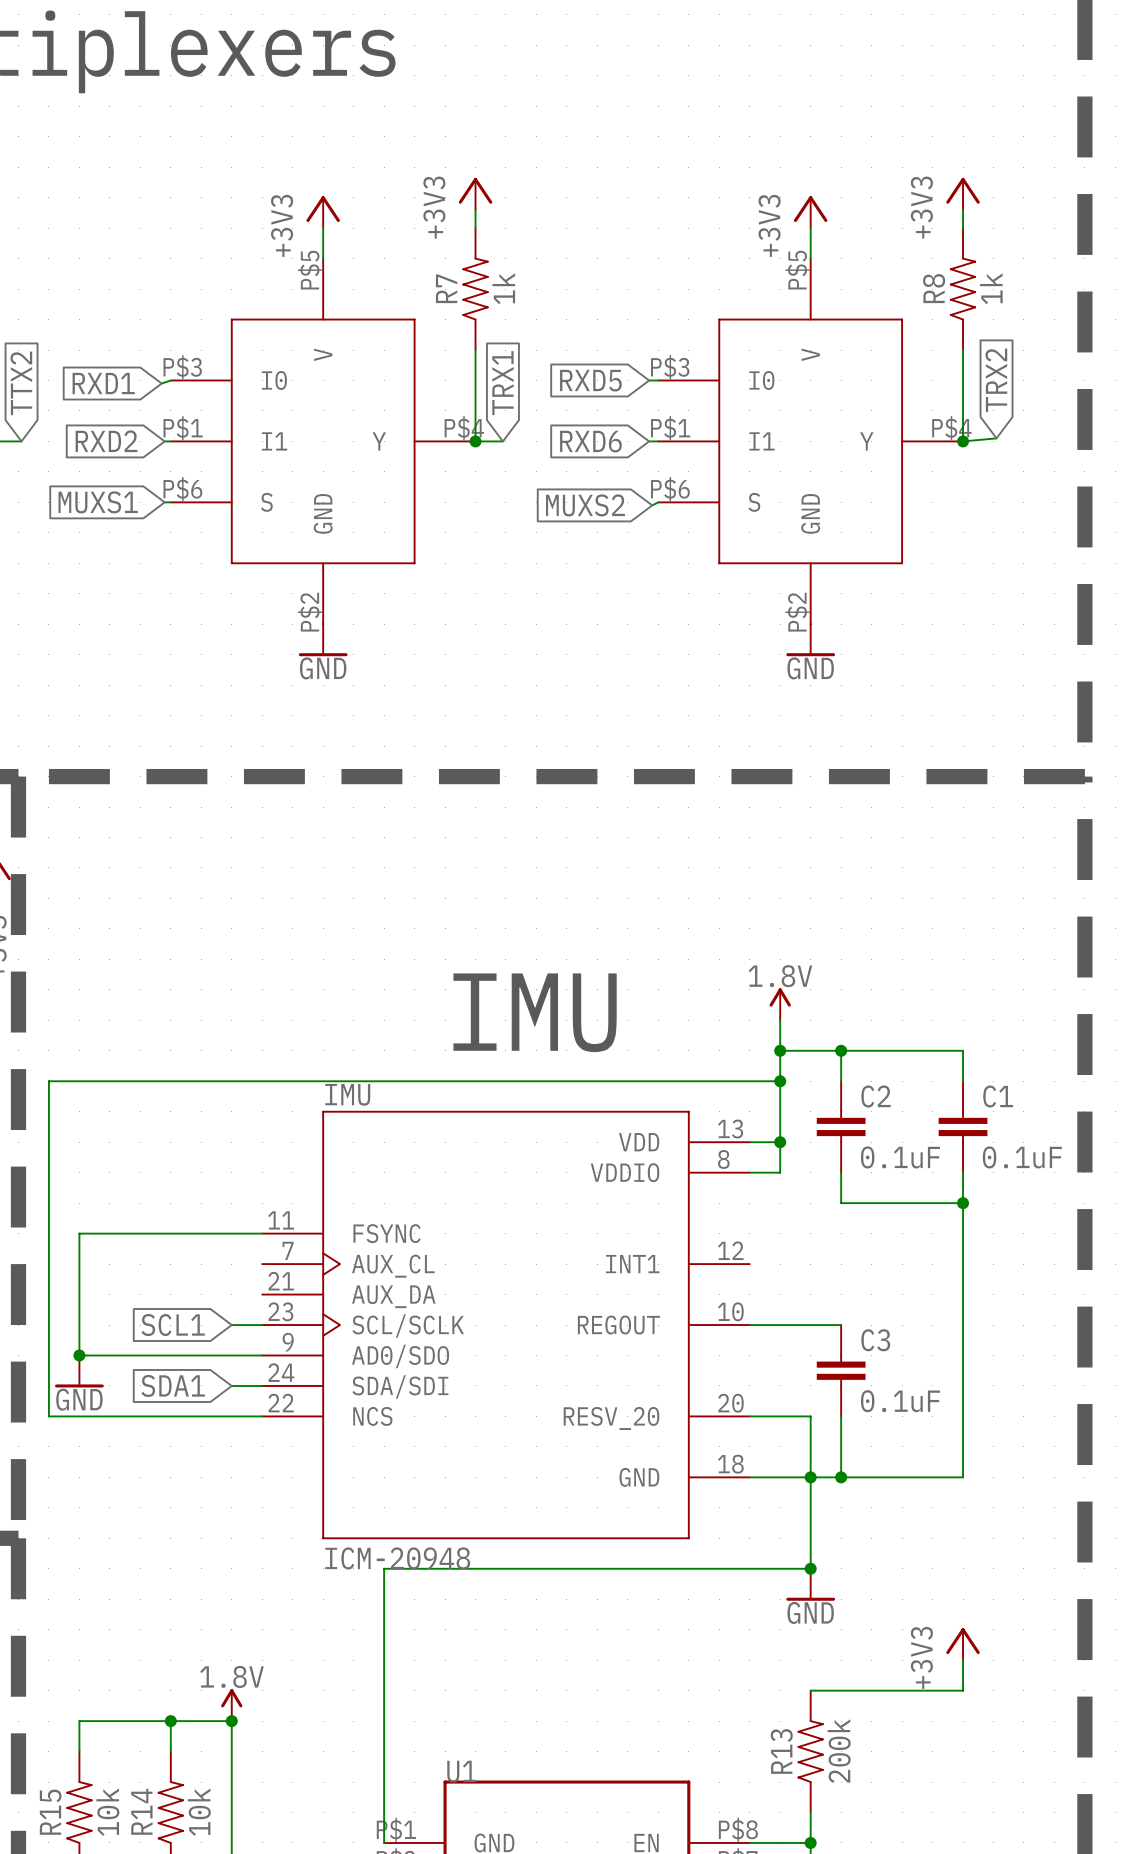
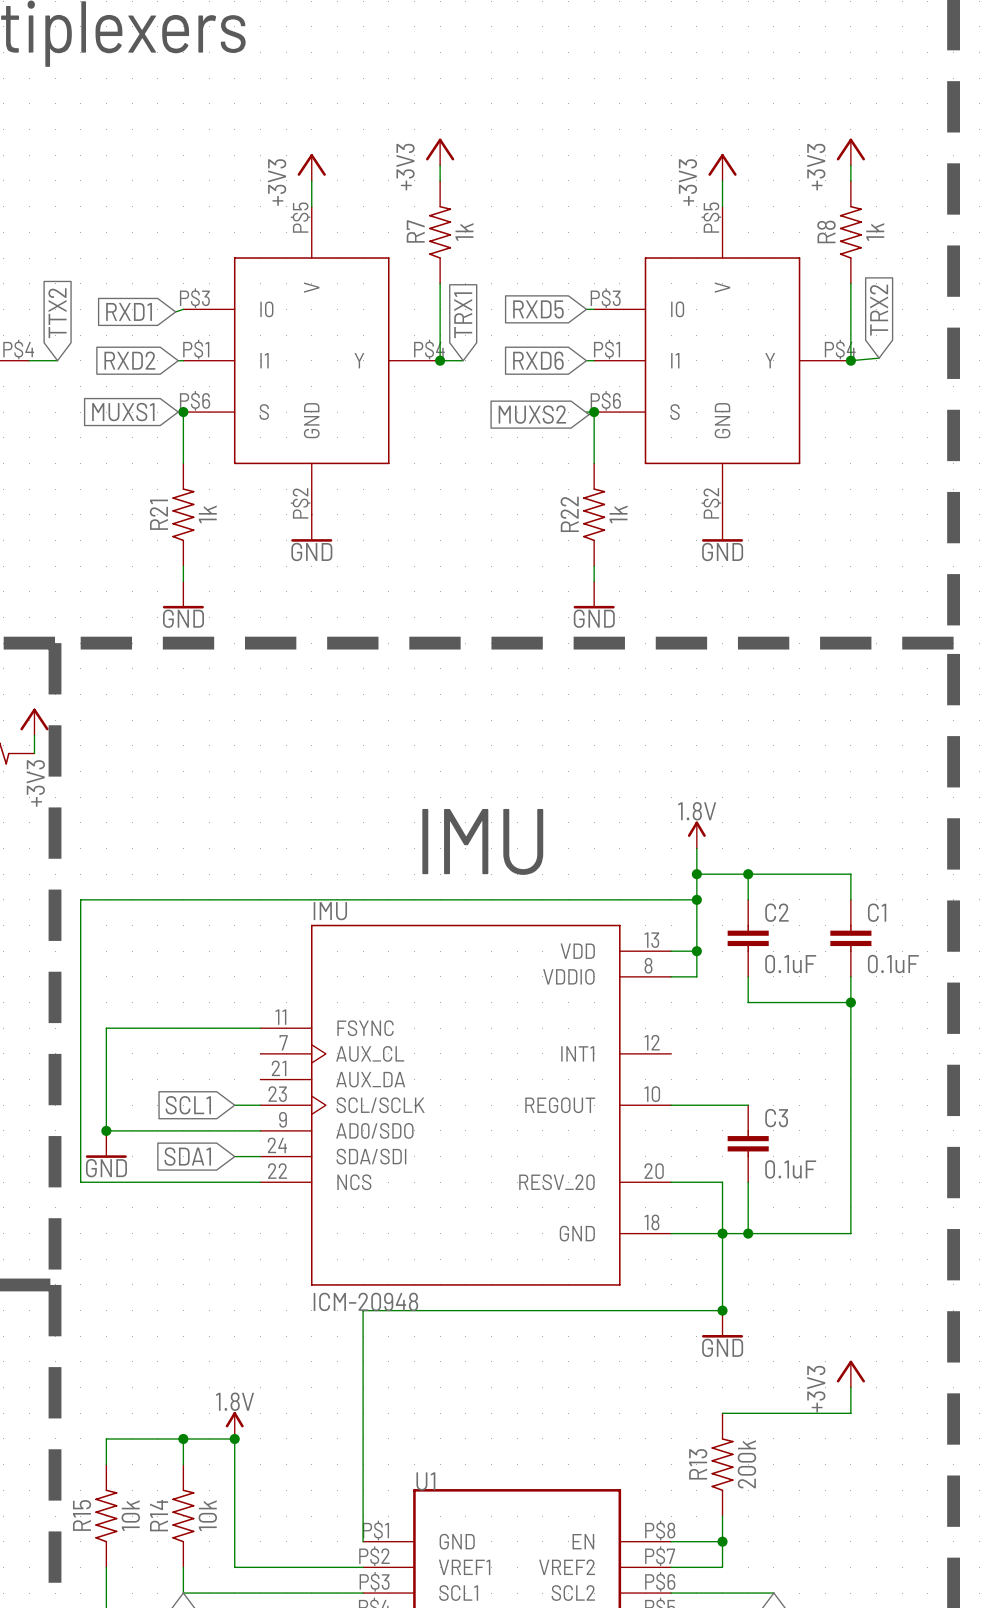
wire: none -> (183, 412) (183, 463)
junction: none -> (183, 412)
wire: none -> (586, 412) (594, 412) (594, 463)
junction: none -> (594, 412)
R21: none -> 1k (183, 514)
R22: none -> 1k (594, 514)
wire: none -> (183, 566) (183, 581)
wire: none -> (594, 566) (594, 581)
power symbol: none -> GND (183, 594)
power symbol: none -> GND (594, 594)

